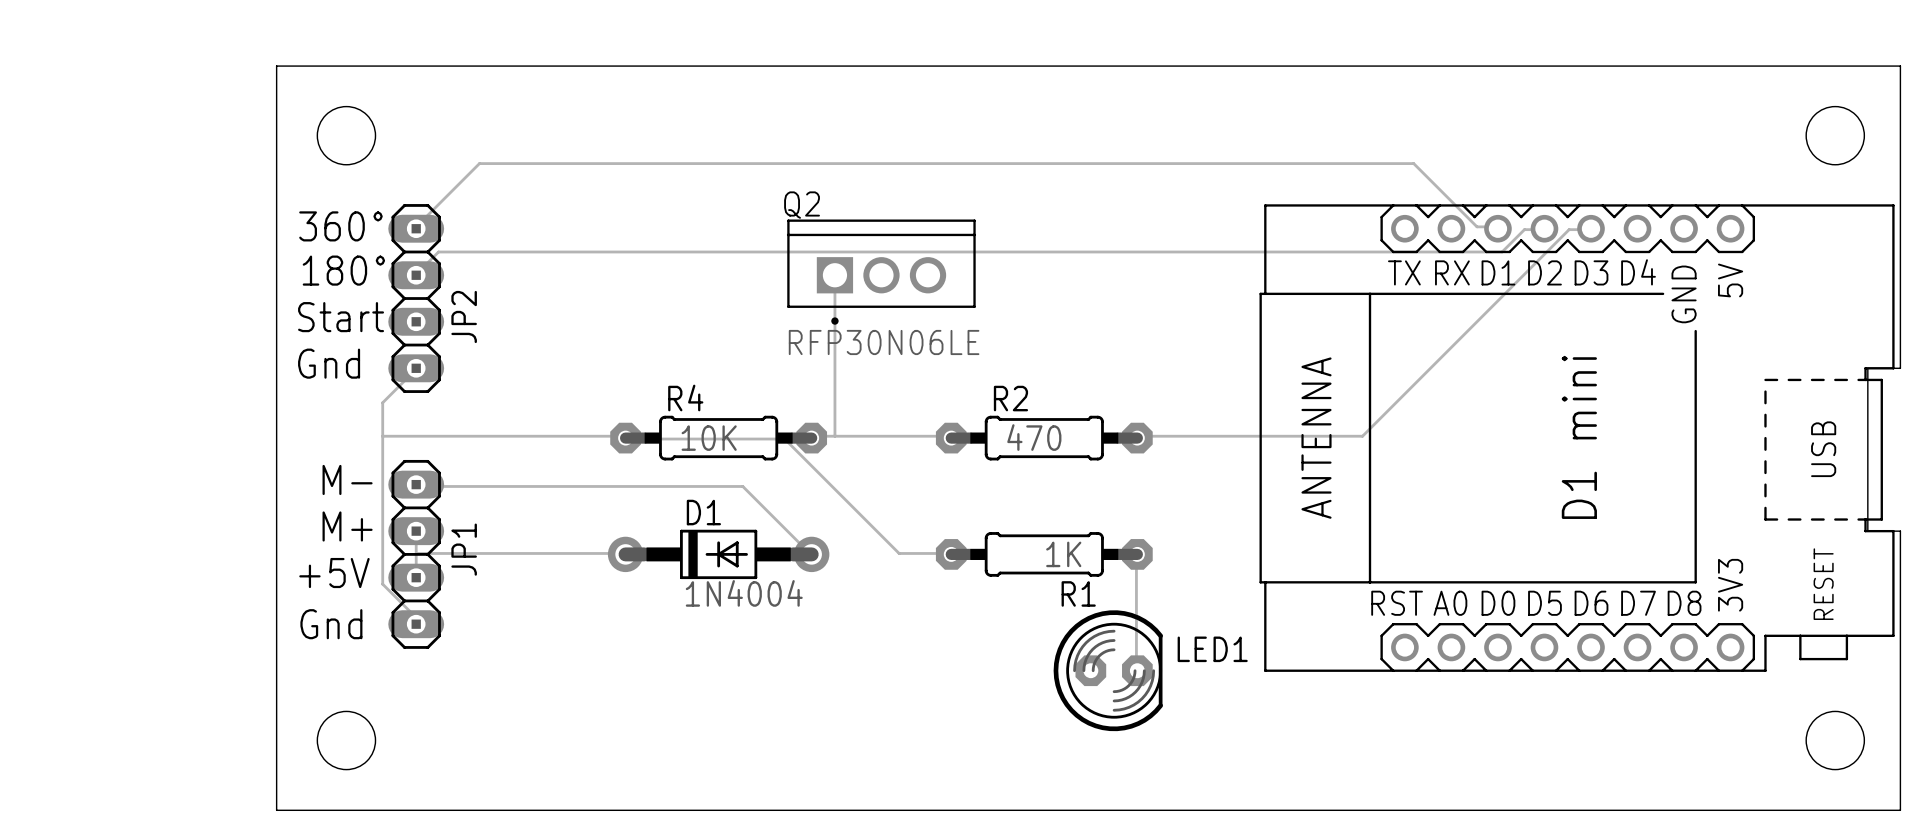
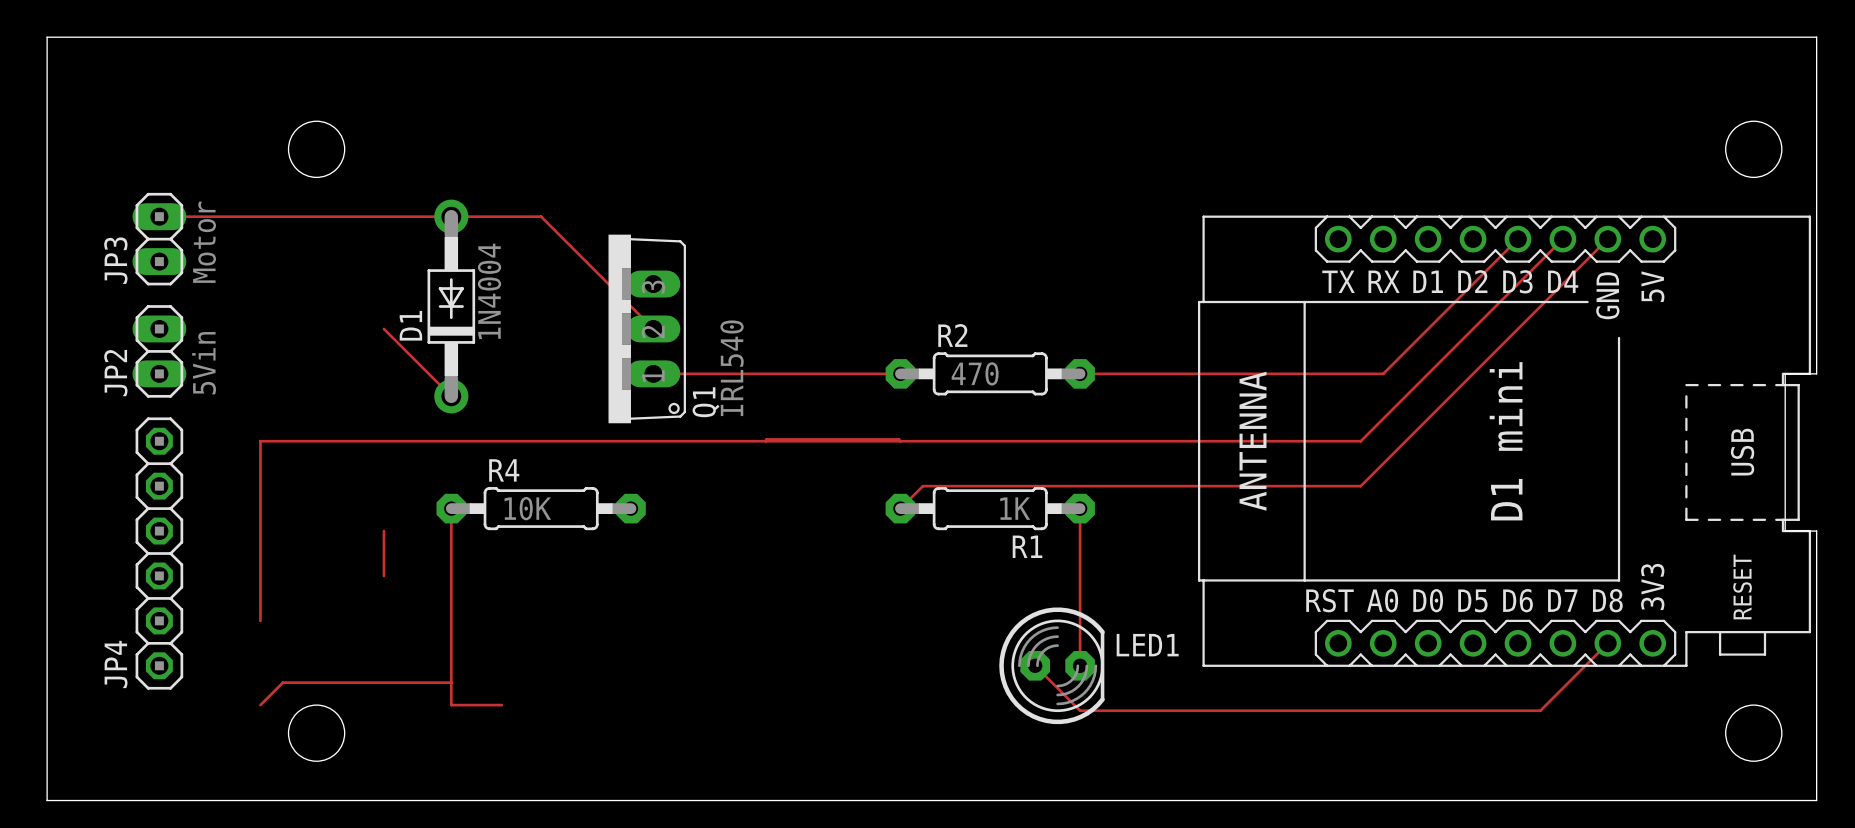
board edge: (1900, 66) (276, 66) (276, 810) -> (1816, 82) (1816, 37) (47, 37) (47, 800) (249, 800)
JP2 footprint: [388, 204, 445, 393] -> [132, 305, 187, 398]
track: none -> (159, 216) (541, 216) (653, 328)
text: 360° (340, 226) -> none
JP3: none -> Motor (159, 239)
track: (416, 228) (479, 163) (1413, 163) (1477, 226) (1496, 226) (1497, 228) -> none
track: (1544, 228) (1524, 229) (1502, 251) (438, 251) (416, 275) -> none
track: (1591, 228) (1569, 229) (1362, 436) (1139, 436) (1137, 438) -> (1517, 239) (1383, 373) (1080, 373)
track: none -> (1562, 239) (1360, 441) (260, 441) (260, 620)
track: none -> (1607, 239) (1360, 486) (922, 486) (900, 508)
text: 180° (343, 270) -> none
Q2: RFP30N06LE (881, 272) -> none
track: (834, 275) (834, 436) -> none
JP2 name position: JP2 (464, 316) -> JP2 (115, 373)
text: Start (341, 317) -> none
track: none -> (383, 328) (451, 396)
Q1: none -> IRL540 (647, 328)
JP2 value: none -> 5Vin (204, 363)
text: Gnd (329, 363) -> none
track: (416, 368) (382, 402) (382, 584) (416, 617) (416, 624) -> none
track: none -> (653, 373) (900, 373)
track: (382, 436) (625, 436) (625, 439) (784, 439) (899, 553) (951, 554) -> none
R4 position: (718, 438) -> (541, 508)
R2 position: (1044, 438) -> (990, 373)
text: M- (347, 479) -> none
track: (416, 484) (416, 486) (742, 486) (811, 554) -> none
track: none -> (451, 508) (451, 705) (501, 705)
text: M+ (347, 526) -> none
track: (416, 553) (625, 554) -> none
JP4: none -> (159, 553)
JP1: (416, 554) -> none
D1 rotation: 0° (718, 554) -> 90° counterclockwise (451, 306)
D1 position: (718, 554) -> (451, 306)
R1 position: (1044, 554) -> (990, 508)
track: (1137, 554) (1137, 670) -> (1080, 508) (1080, 665)
text: +5V (334, 573) -> none
text: Gnd (331, 624) -> none
track: none -> (1607, 643) (1540, 710) (1080, 710) (1035, 665)
track: none -> (451, 682) (282, 682) (260, 705)

